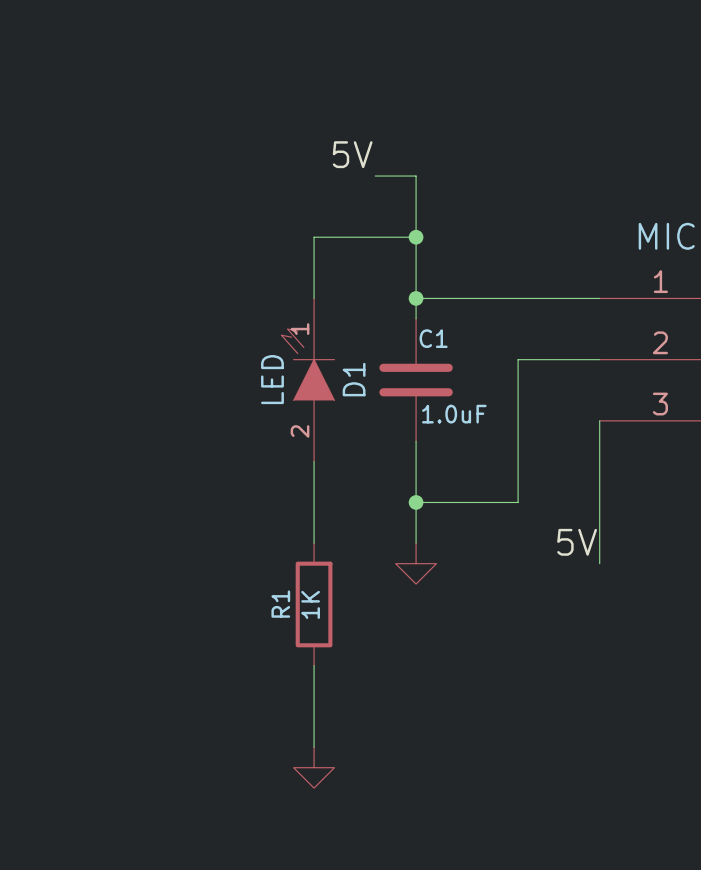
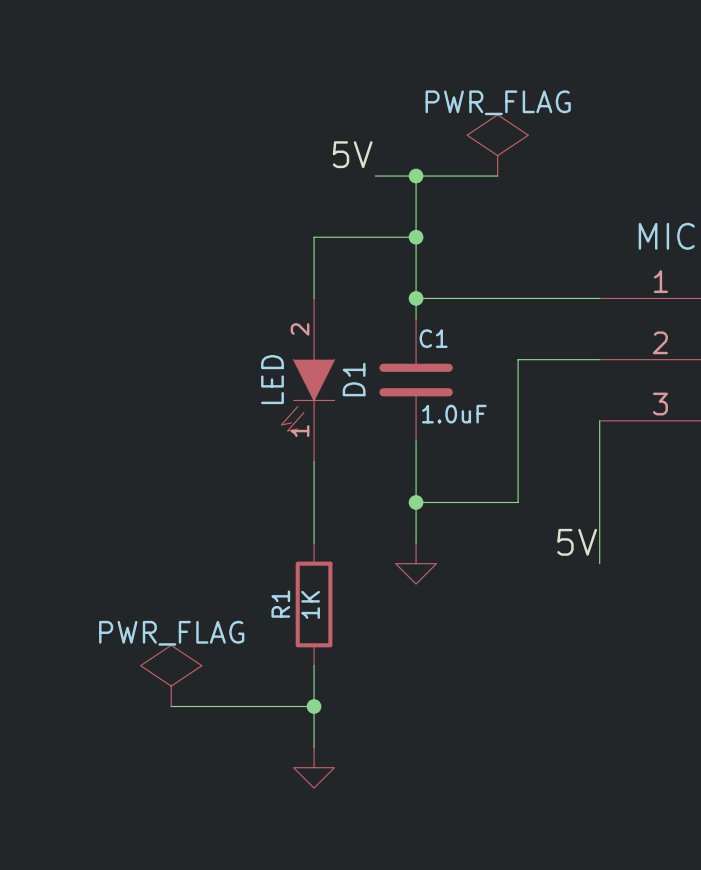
power symbol: none -> PWR_FLAG (497, 145)
wire: none -> (416, 176) (497, 176)
junction: none -> (416, 176)
D1 flip: as is (307, 364) -> up-down (307, 395)
power symbol: none -> PWR_FLAG (171, 675)
wire: none -> (171, 706) (314, 706)
junction: none -> (314, 706)

